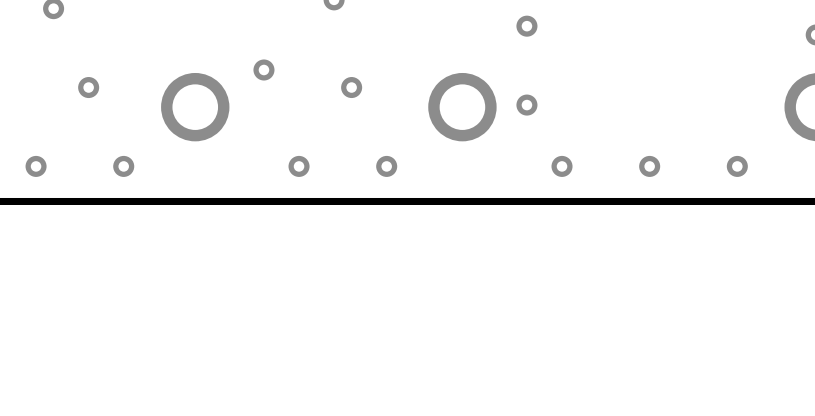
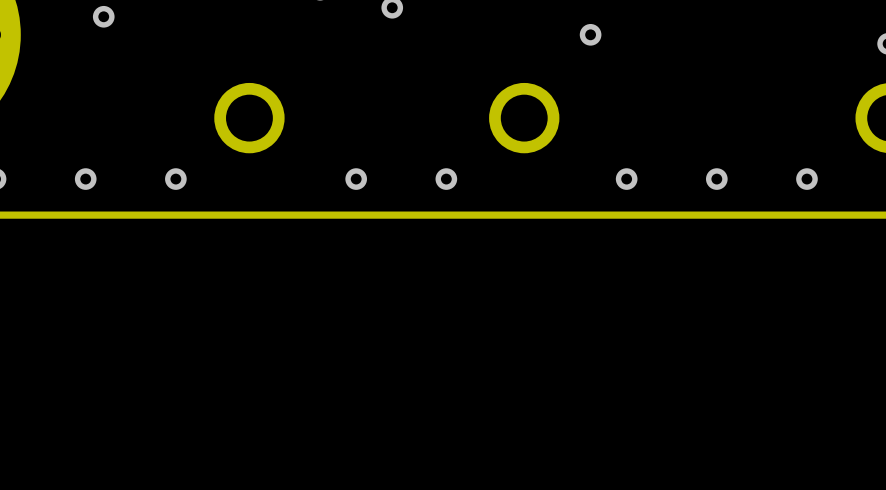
via: (263, 70) -> none
via: (88, 87) -> none
via: (351, 87) -> none
via: (526, 105) -> none

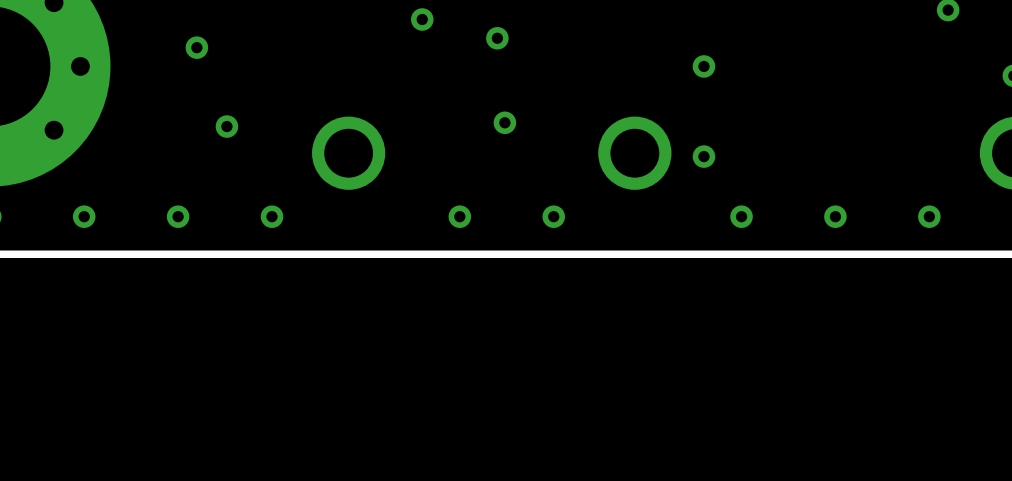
via: none -> (504, 122)
via: none -> (226, 126)
via: none -> (703, 156)

